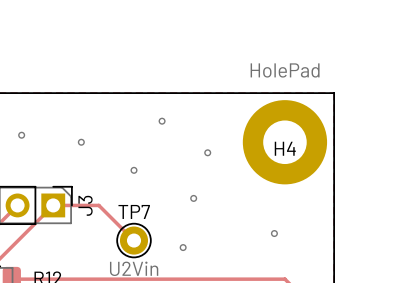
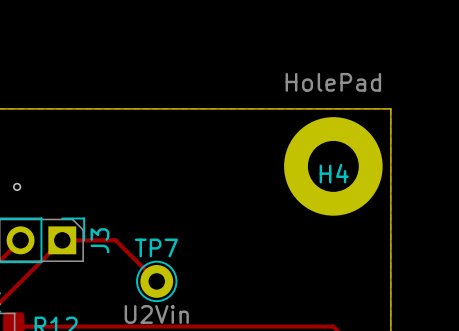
via: (162, 121) -> none
via: (21, 135) -> none
via: (81, 142) -> none
via: (207, 152) -> none
via: none -> (17, 186)
via: (133, 170) -> none
via: (193, 198) -> none
via: (274, 233) -> none
via: (183, 247) -> none

